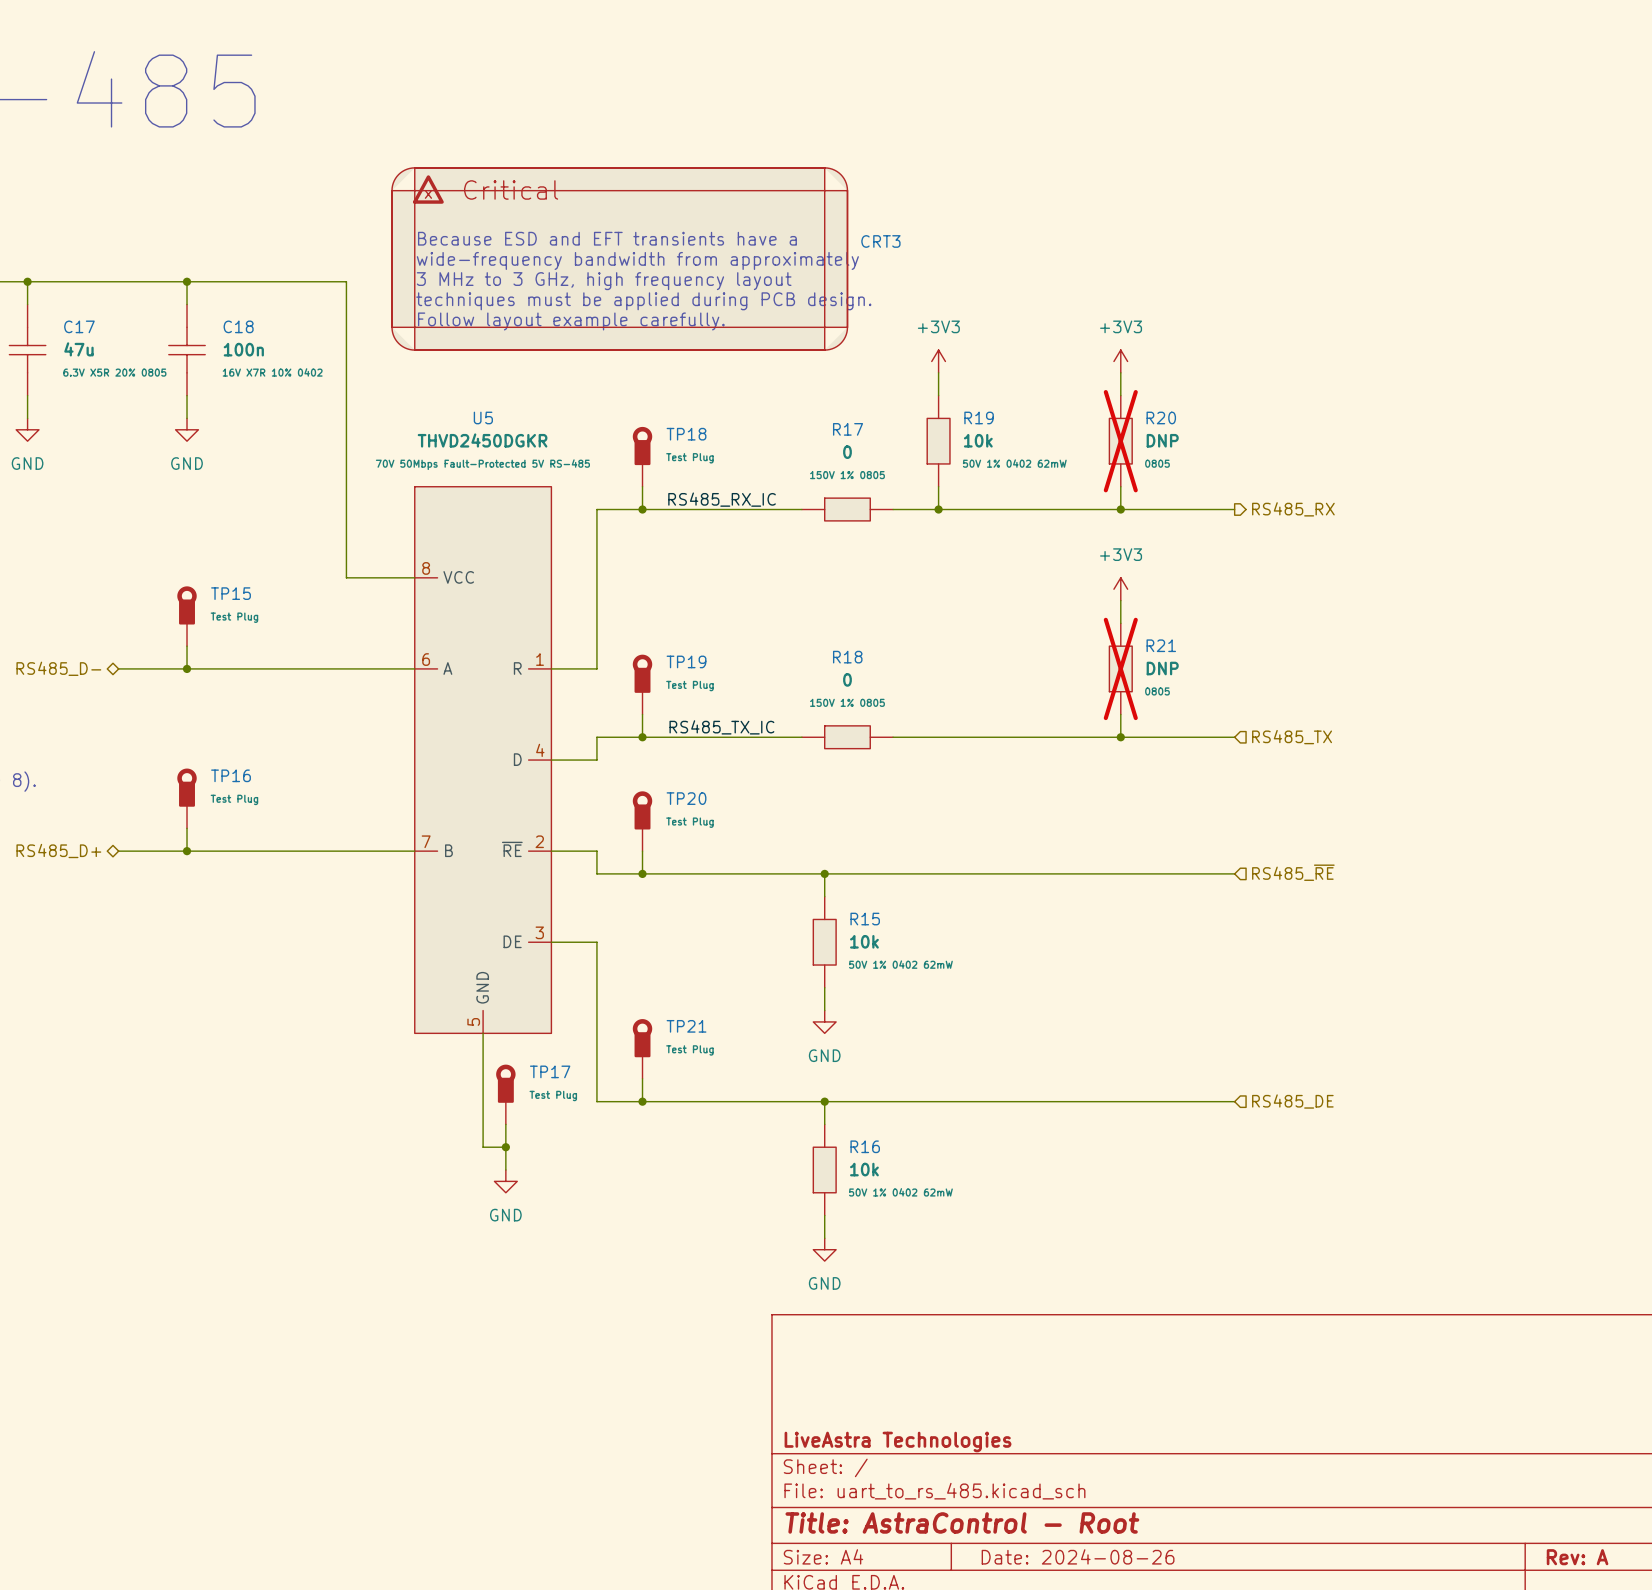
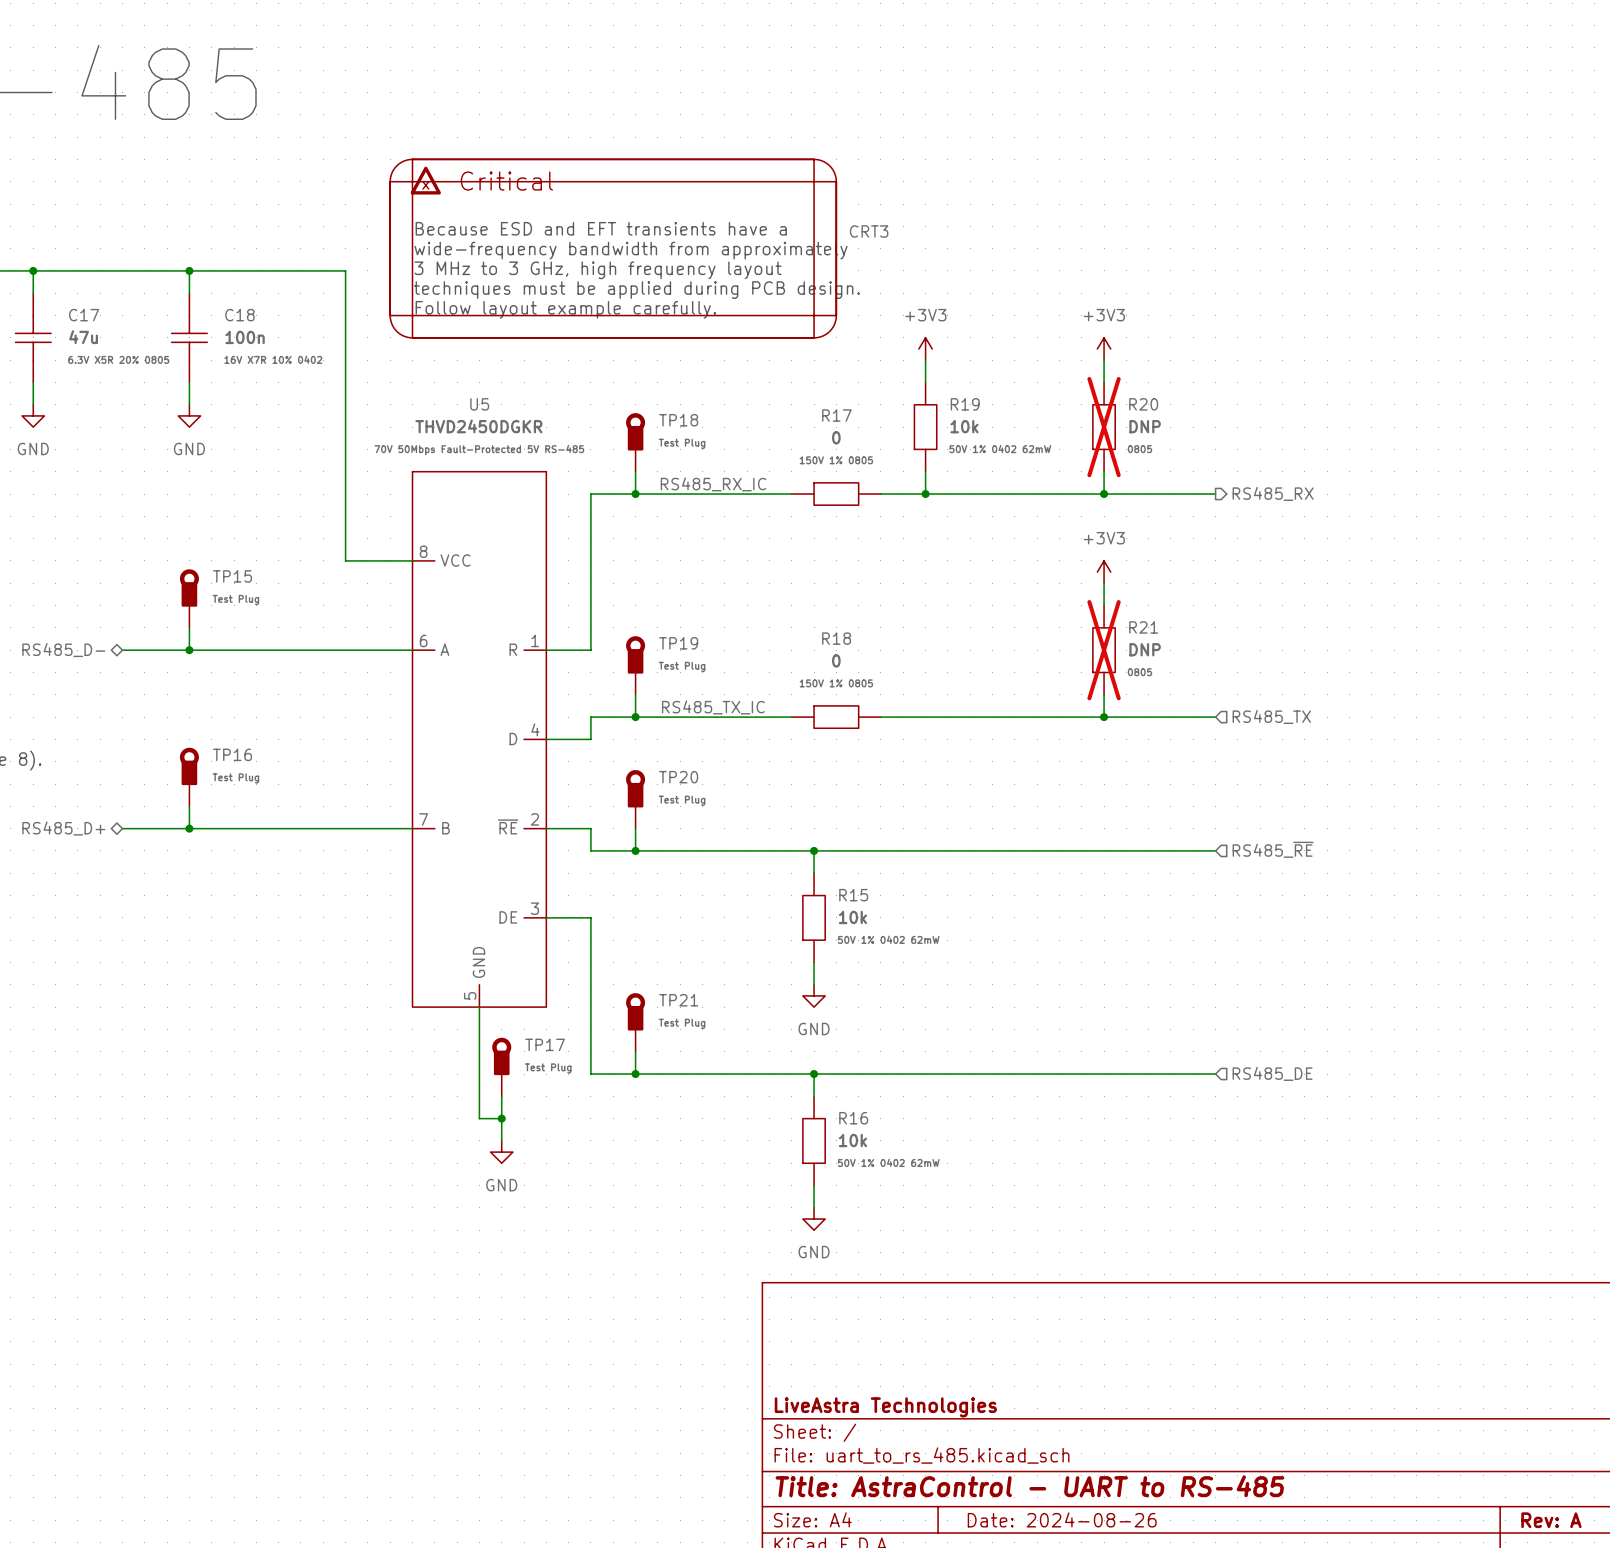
title block: Title: AstraControl - Root (962, 1522) -> Title: AstraControl - UART to RS-485 (1029, 1486)

